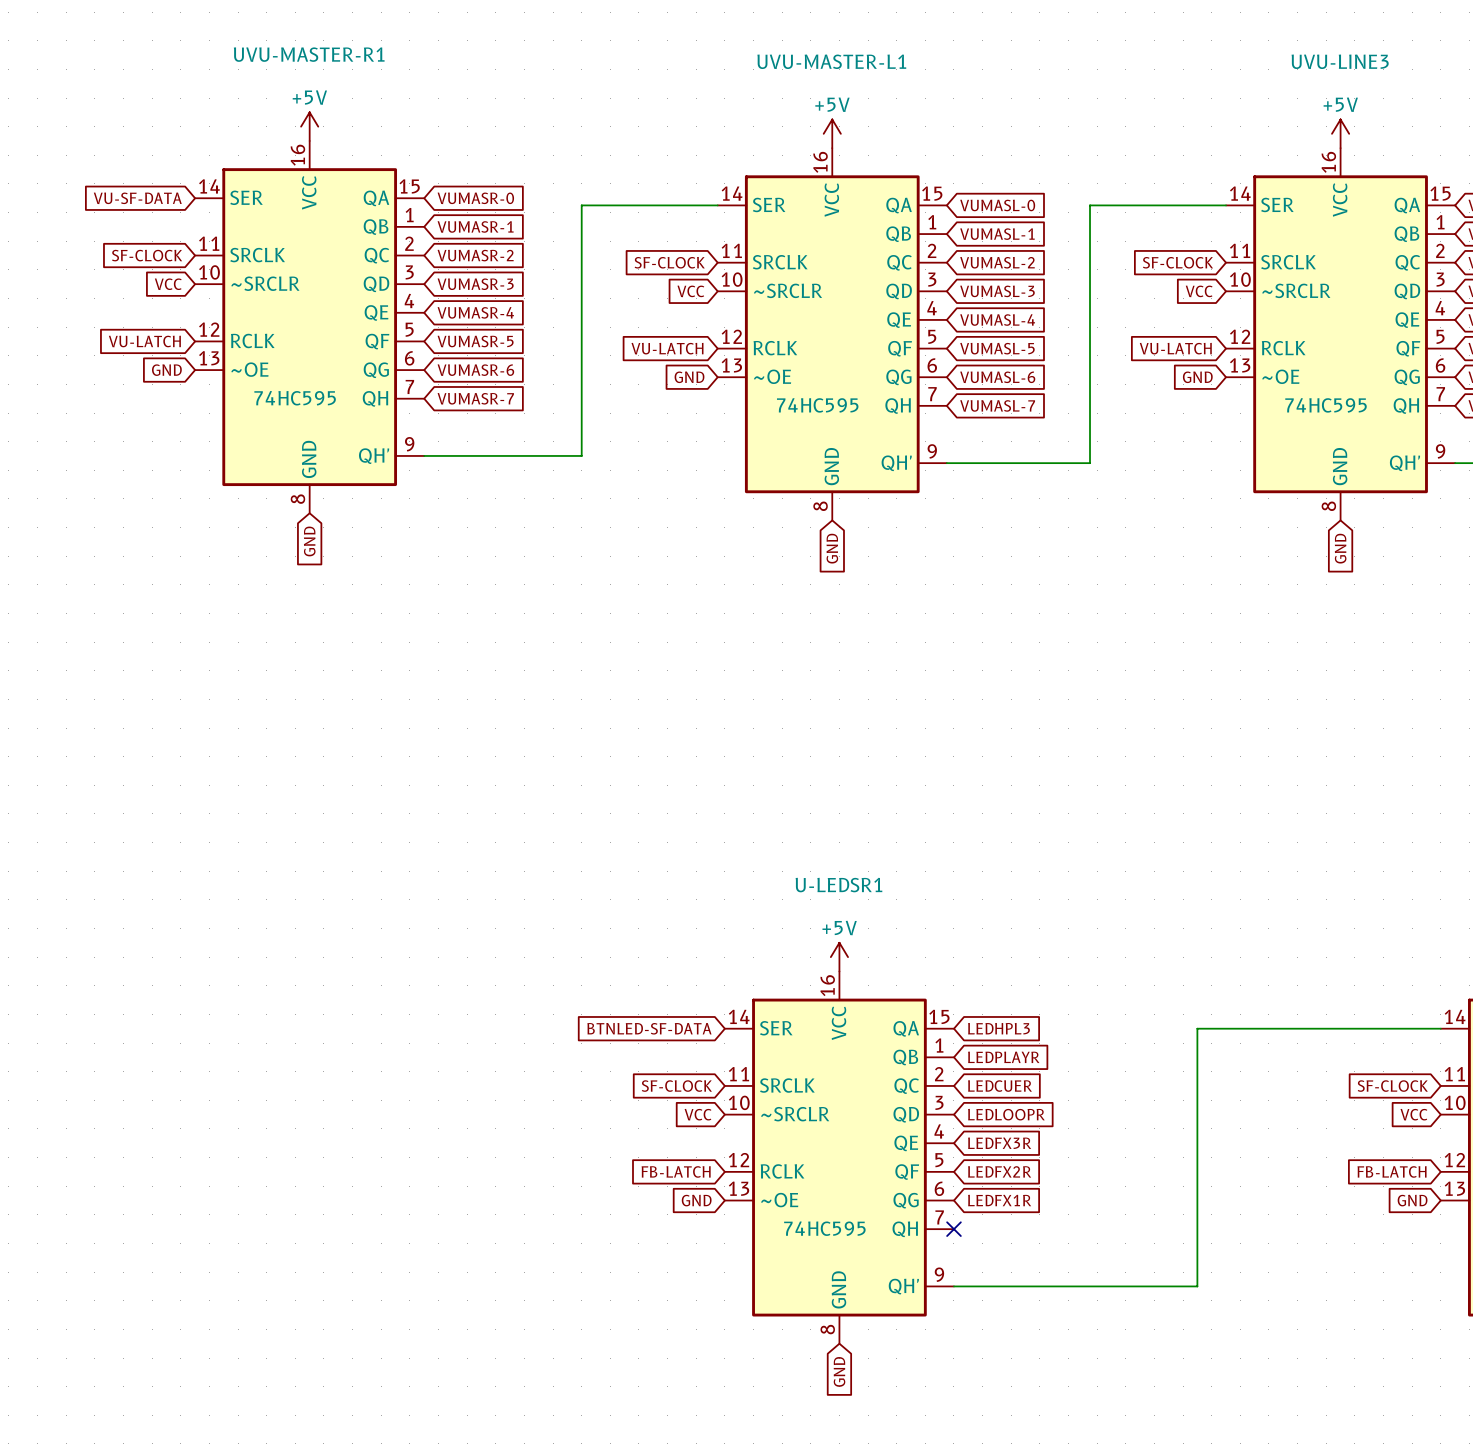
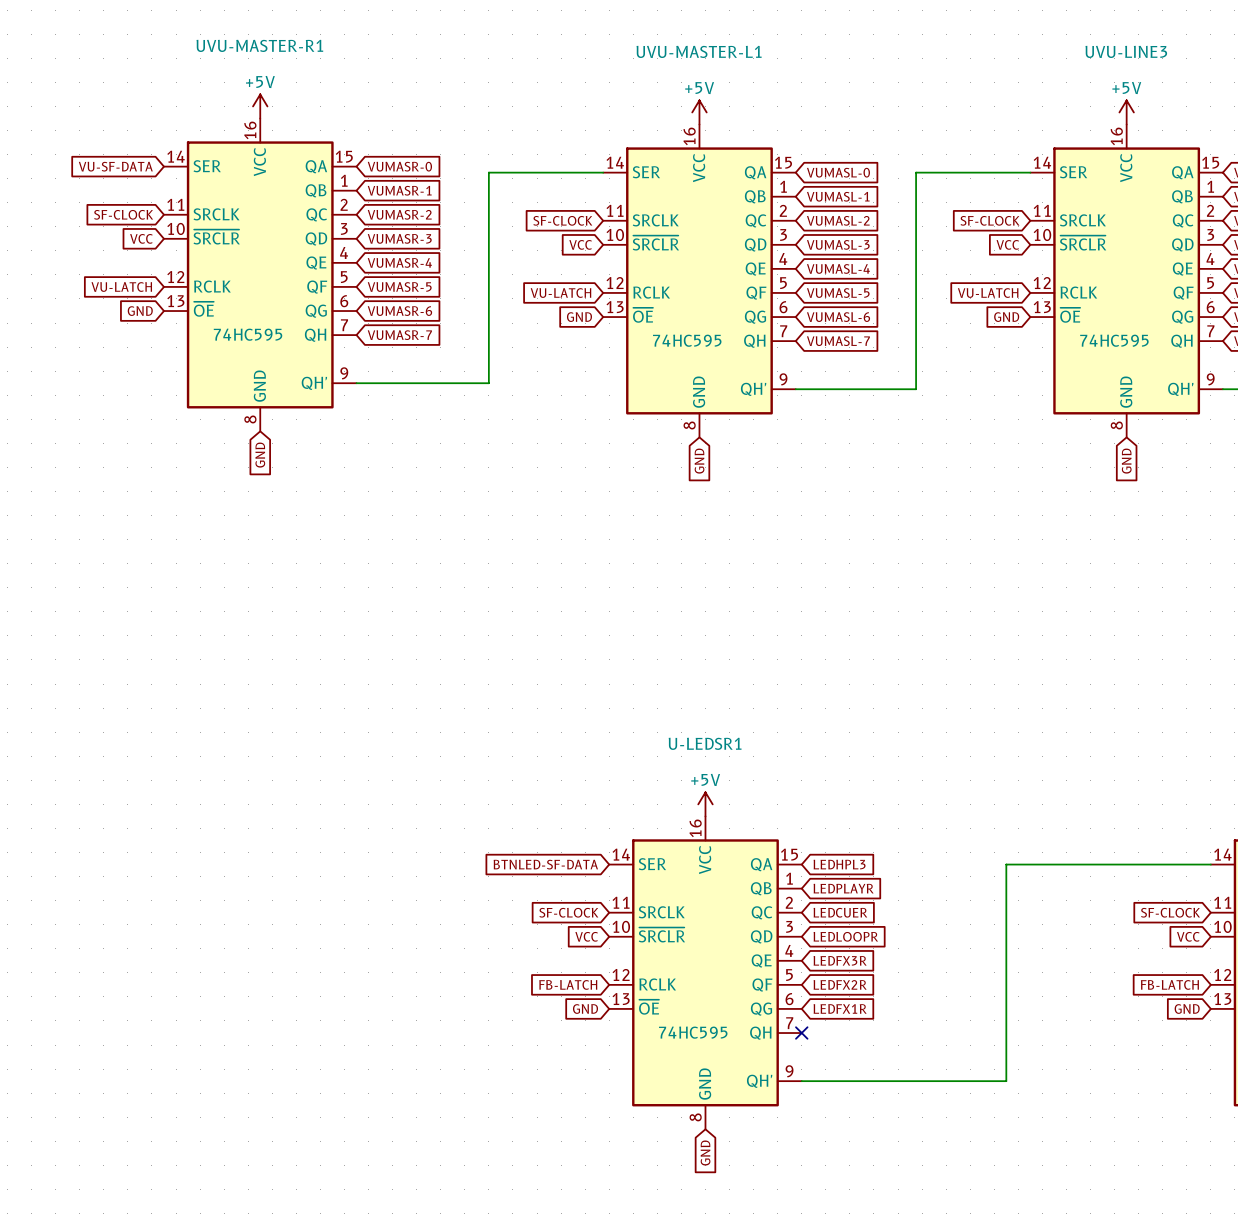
UVU-MASTER-R1 pin name: ~SRCLR (265, 283) -> ~{SRCLR} (216, 237)
UVU-MASTER-L1 pin name: ~SRCLR (788, 290) -> ~{SRCLR} (655, 243)
UVU-LINE3 pin name: ~SRCLR (1296, 290) -> ~{SRCLR} (1083, 243)
UVU-MASTER-R1 pin name: ~OE (249, 369) -> ~{OE} (203, 309)
UVU-MASTER-L1 pin name: ~OE (772, 376) -> ~{OE} (643, 315)
UVU-LINE3 pin name: ~OE (1280, 376) -> ~{OE} (1070, 315)
U-LEDSR1 pin name: ~SRCLR (795, 1114) -> ~{SRCLR} (661, 934)
U-LEDSR1 pin name: ~OE (779, 1200) -> ~{OE} (649, 1007)

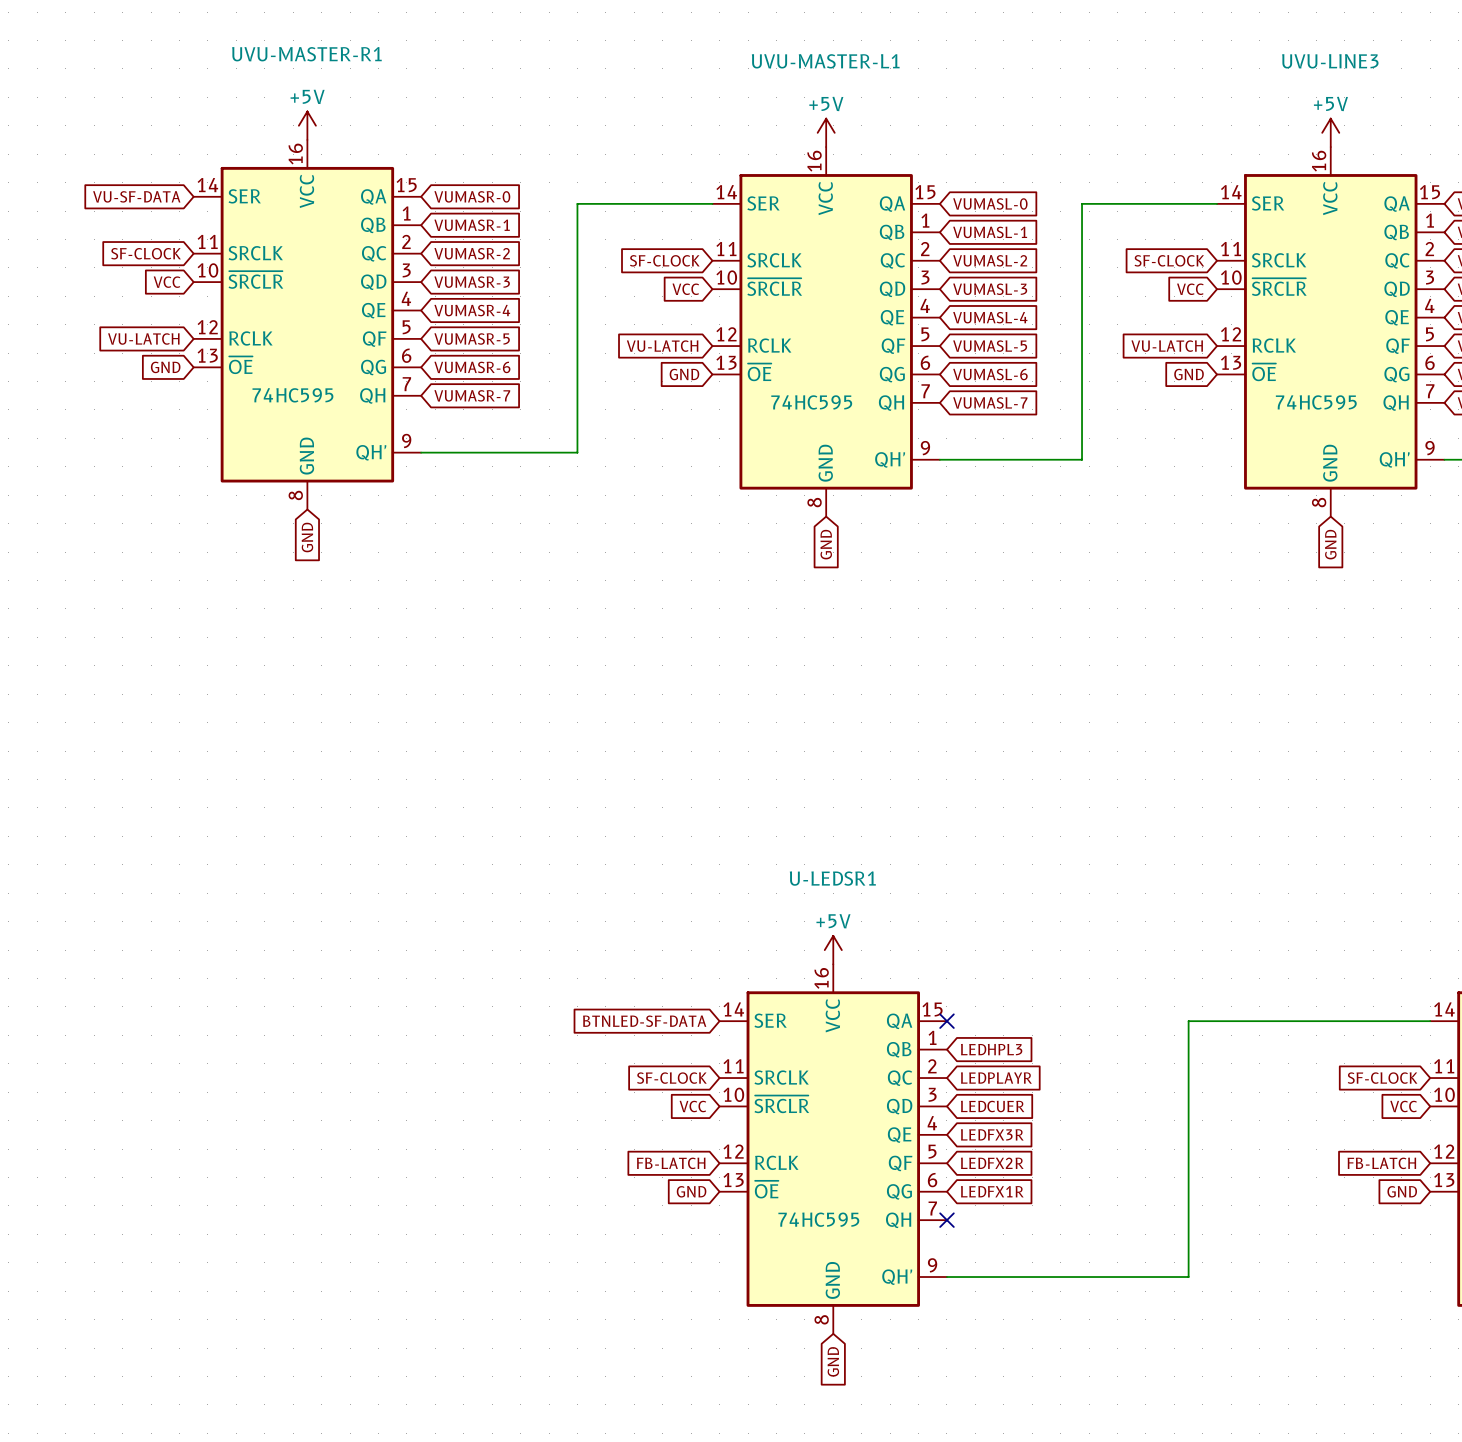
no-connect mark: none -> (946, 1021)
global label: LEDHPL3 (839, 864) -> none
global label: LEDPLAYR (843, 888) -> LEDHPL3 (991, 1049)
global label: LEDCUER (840, 912) -> LEDPLAYR (996, 1078)
global label: LEDLOOPR (845, 936) -> LEDCUER (992, 1106)

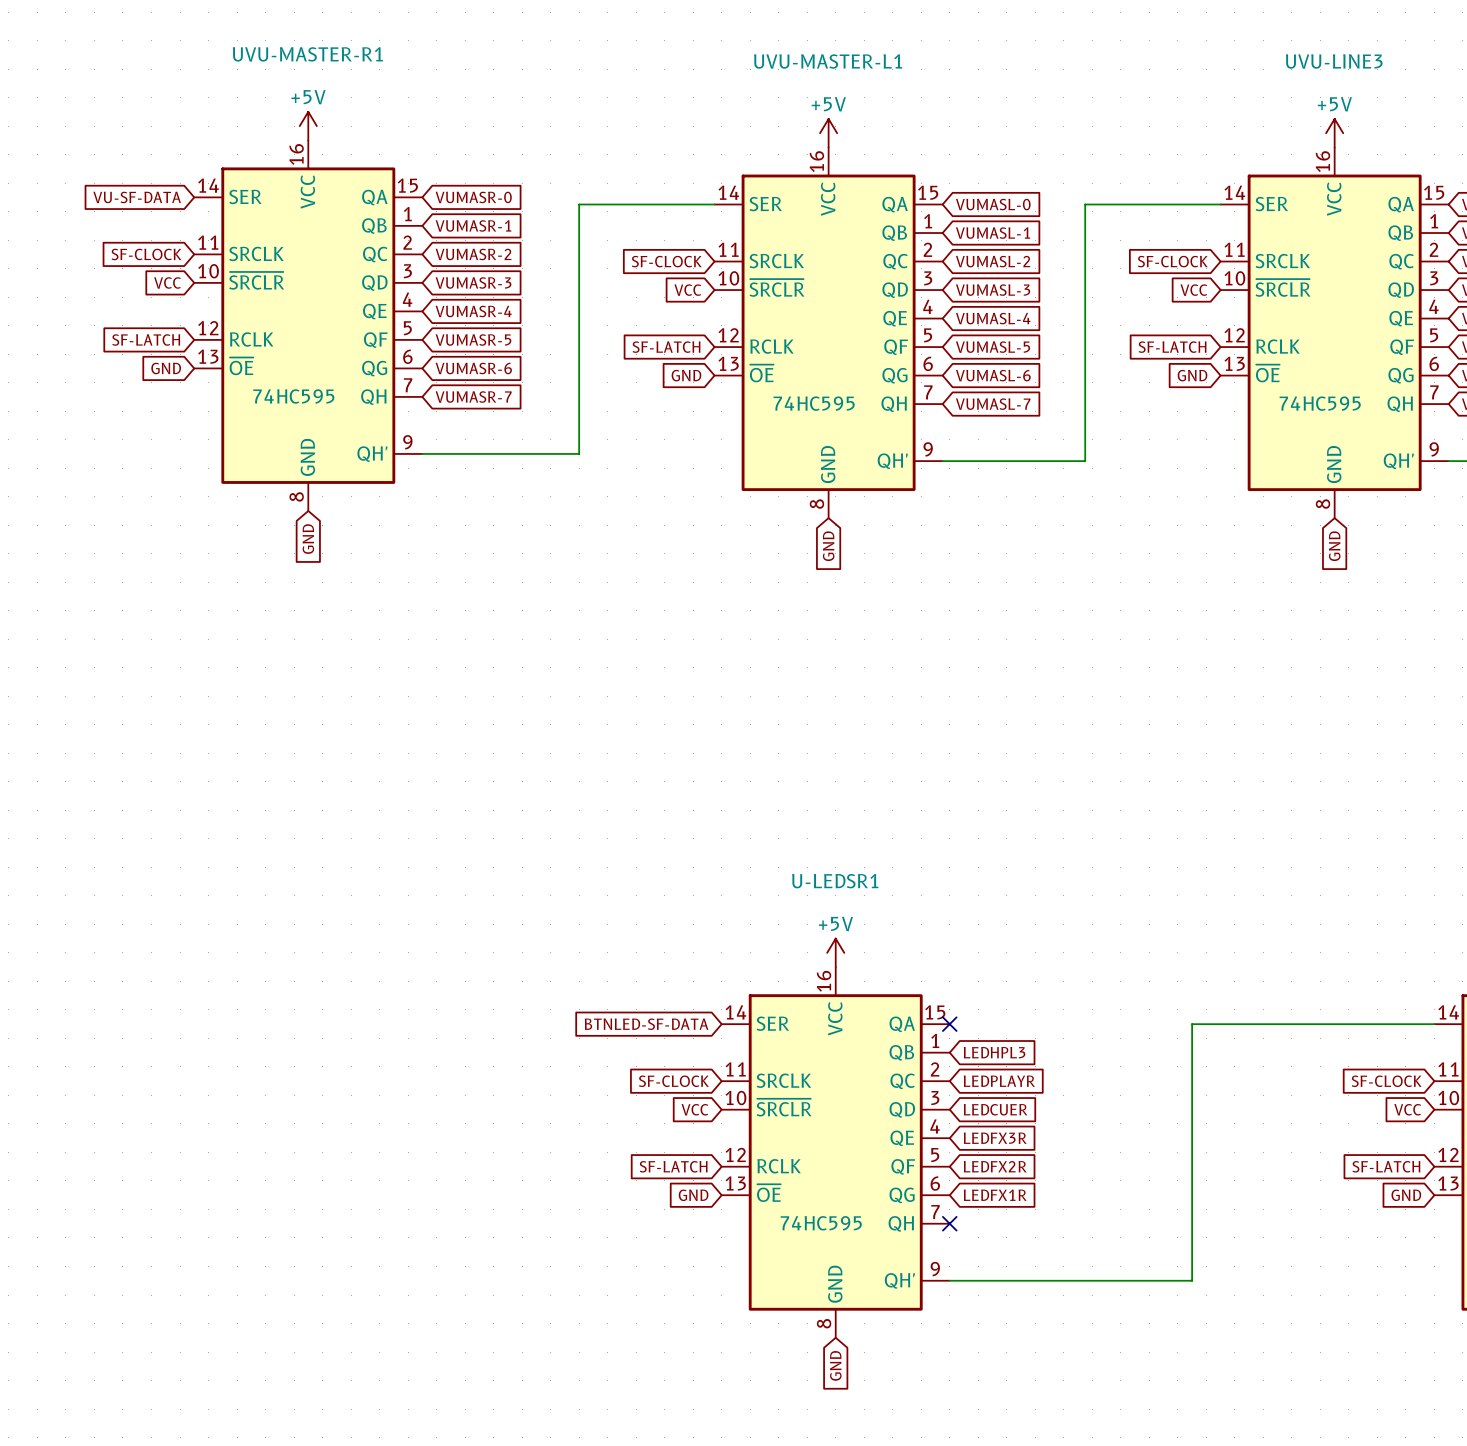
global label: VU-LATCH (143, 339) -> SF-LATCH (146, 339)
global label: VU-LATCH (662, 346) -> SF-LATCH (666, 347)
global label: VU-LATCH (1167, 346) -> SF-LATCH (1172, 347)
global label: FB-LATCH (671, 1163) -> SF-LATCH (673, 1166)
global label: FB-LATCH (1381, 1163) -> SF-LATCH (1386, 1166)

